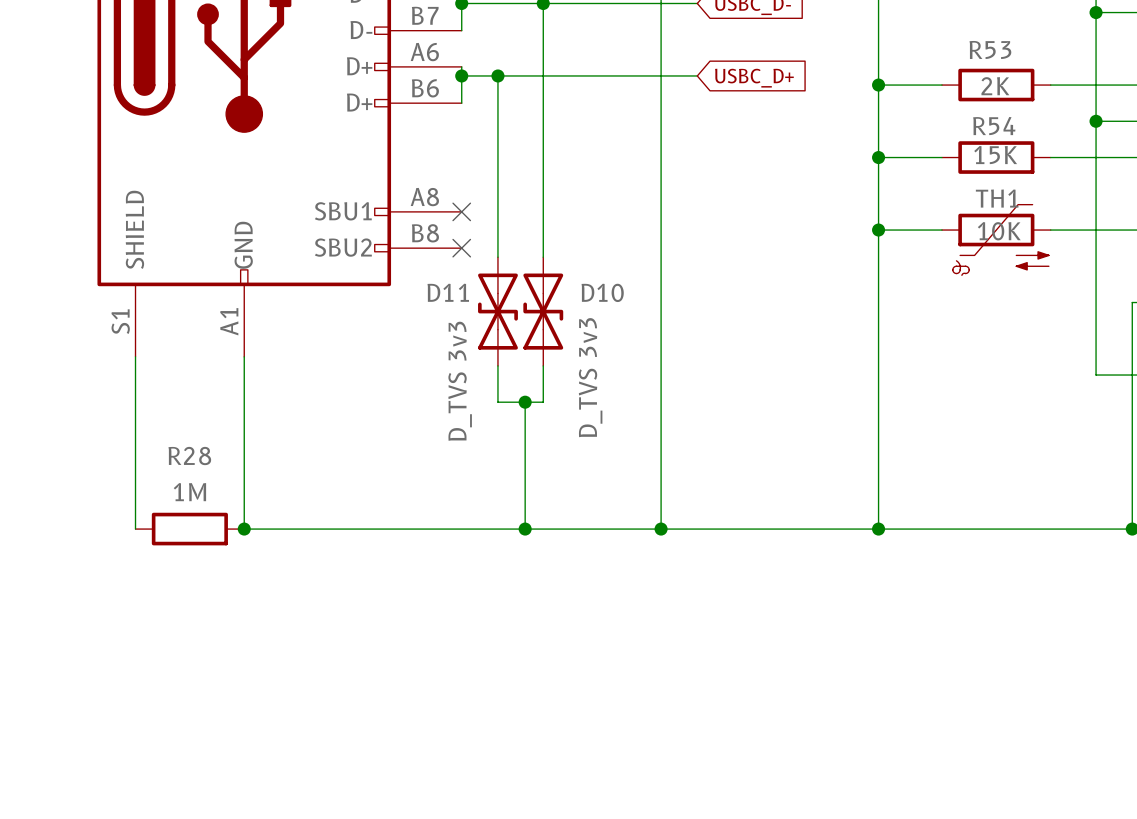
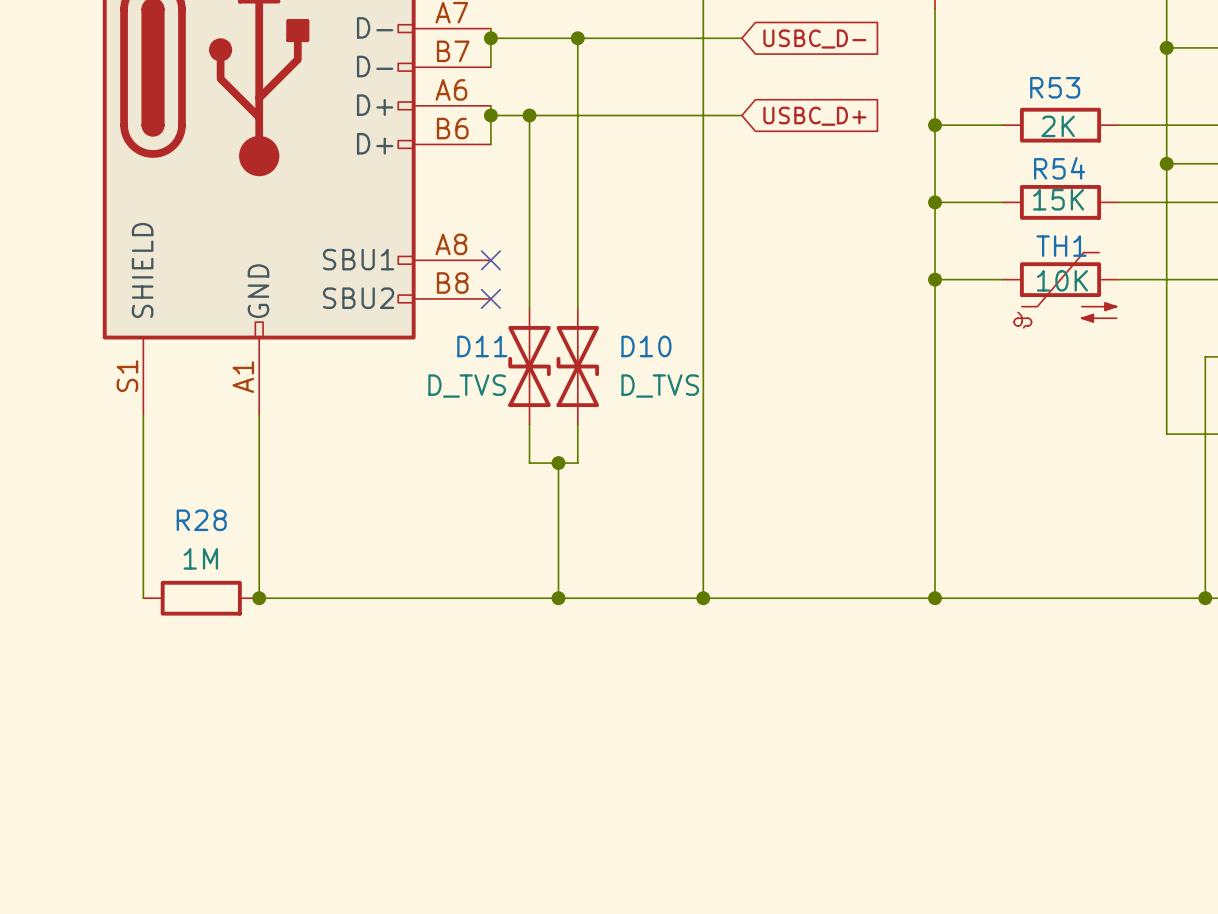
D10 value: D_TVS 3v3 (590, 377) -> D_TVS (660, 386)
D11 value: D_TVS 3v3 (460, 381) -> D_TVS (467, 386)

